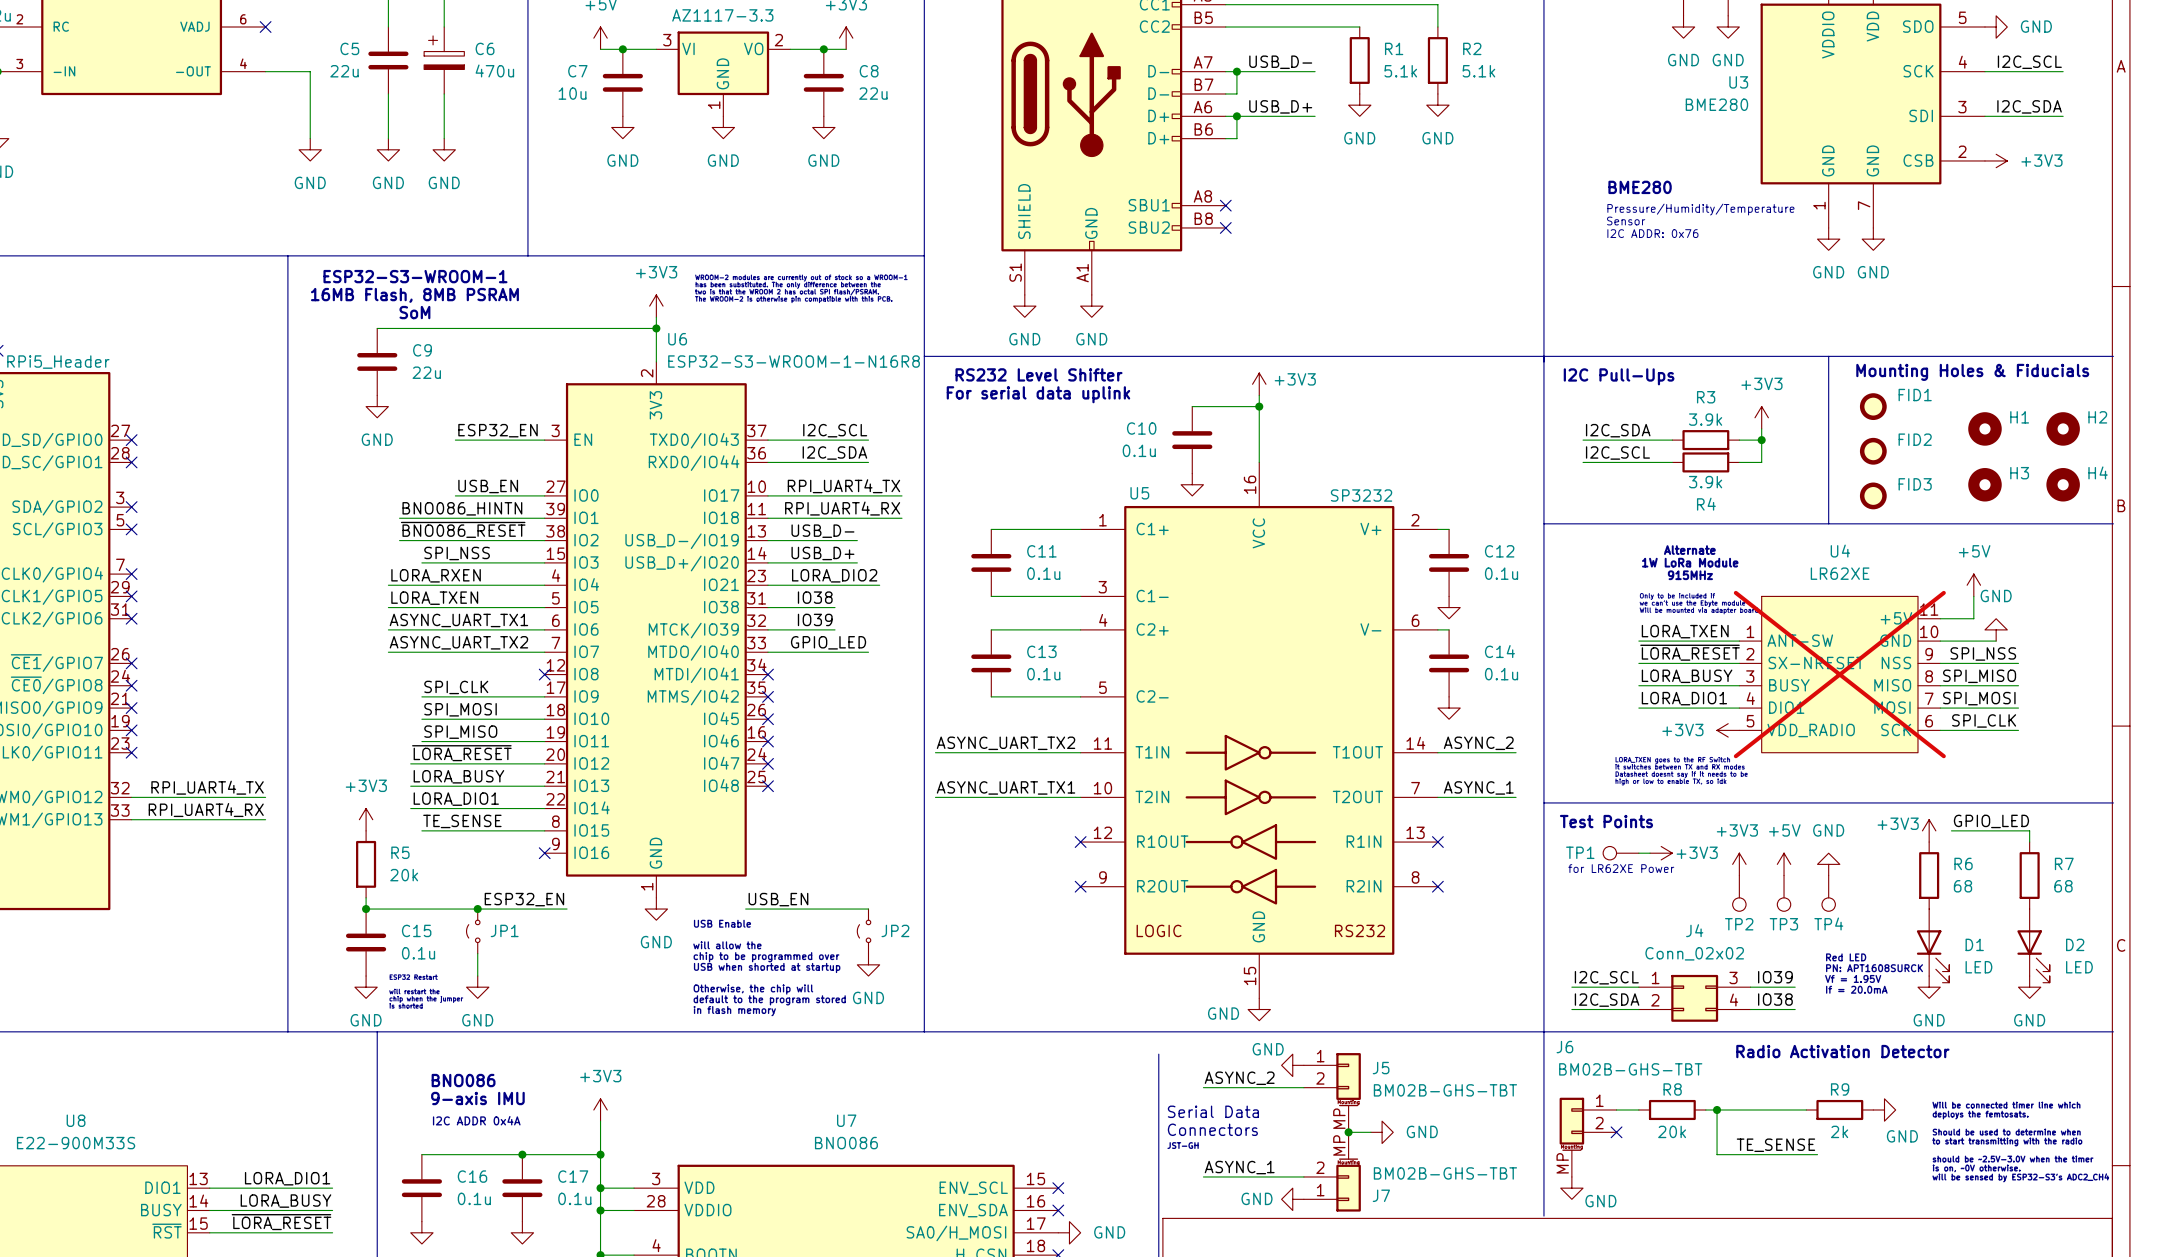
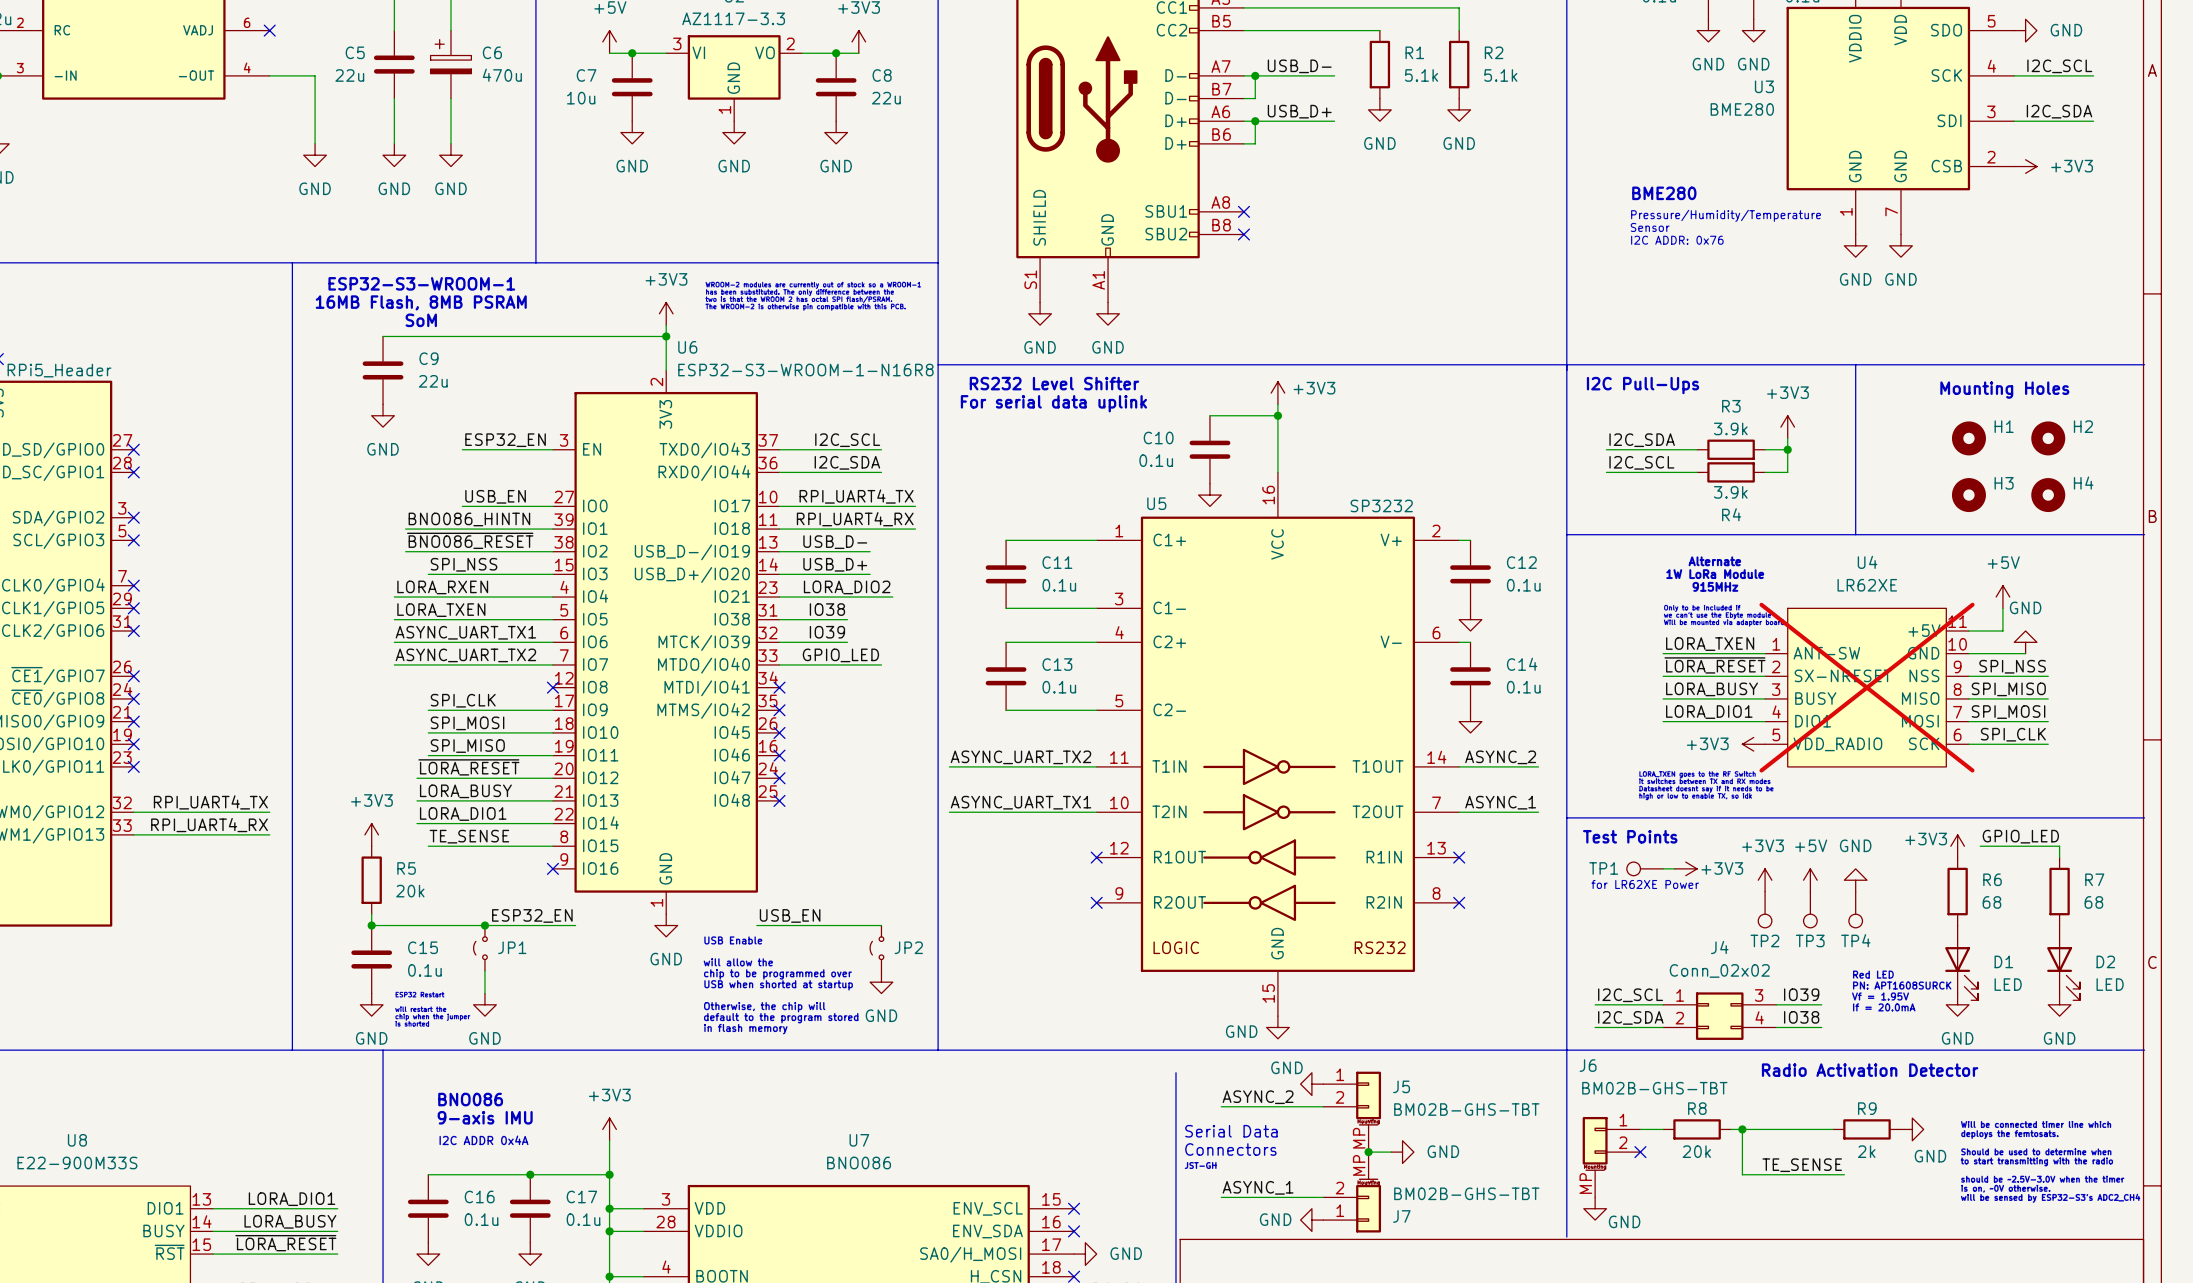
text: Mounting Holes & Fiducials (1972, 372) -> Mounting Holes (2004, 390)
FID1: (1873, 406) -> none
H1 position: (1984, 428) -> (1968, 438)
H2 position: (2063, 428) -> (2048, 438)
FID2: (1873, 451) -> none
H3 position: (1984, 484) -> (1968, 495)
H4 position: (2063, 484) -> (2048, 495)
FID3: (1873, 495) -> none

